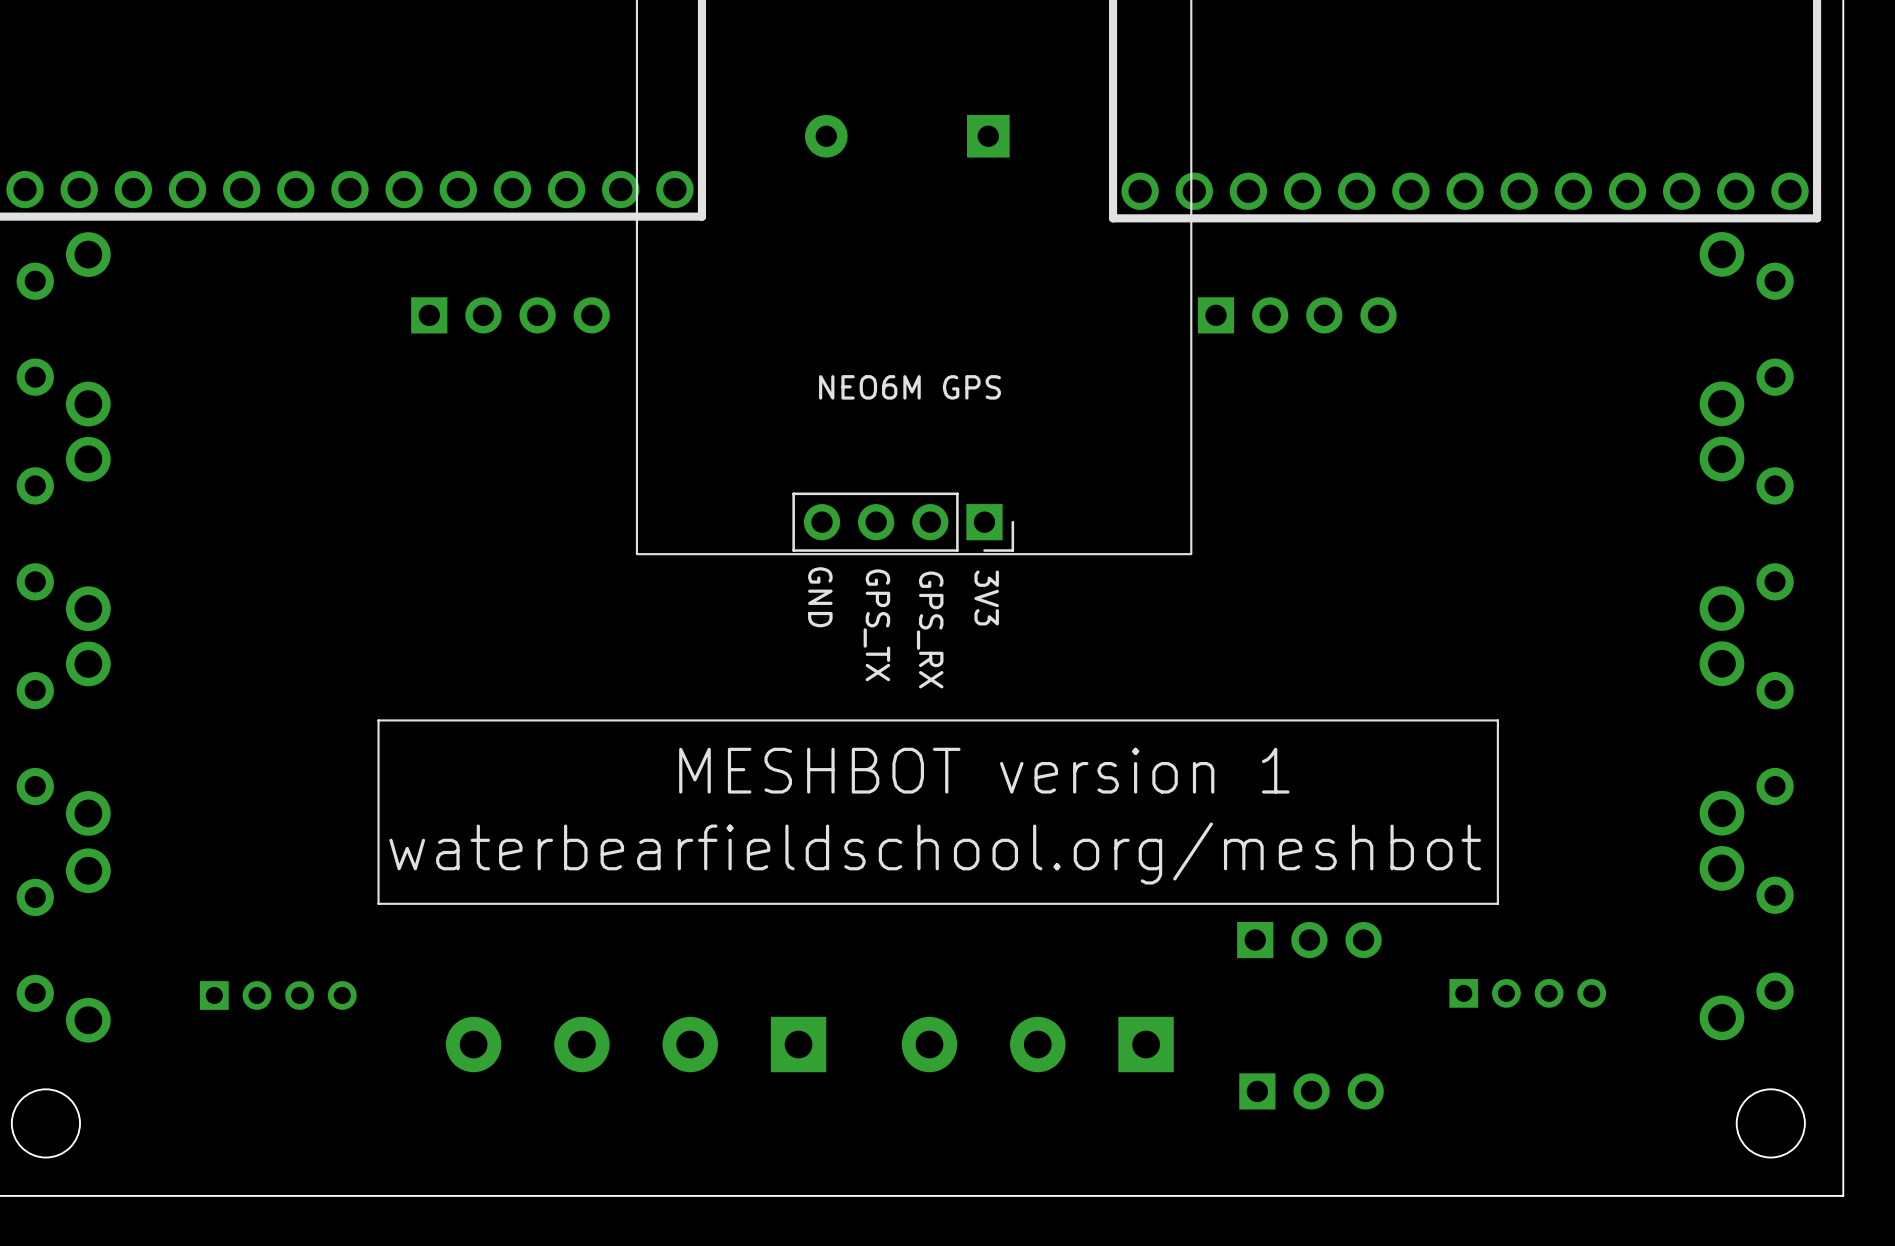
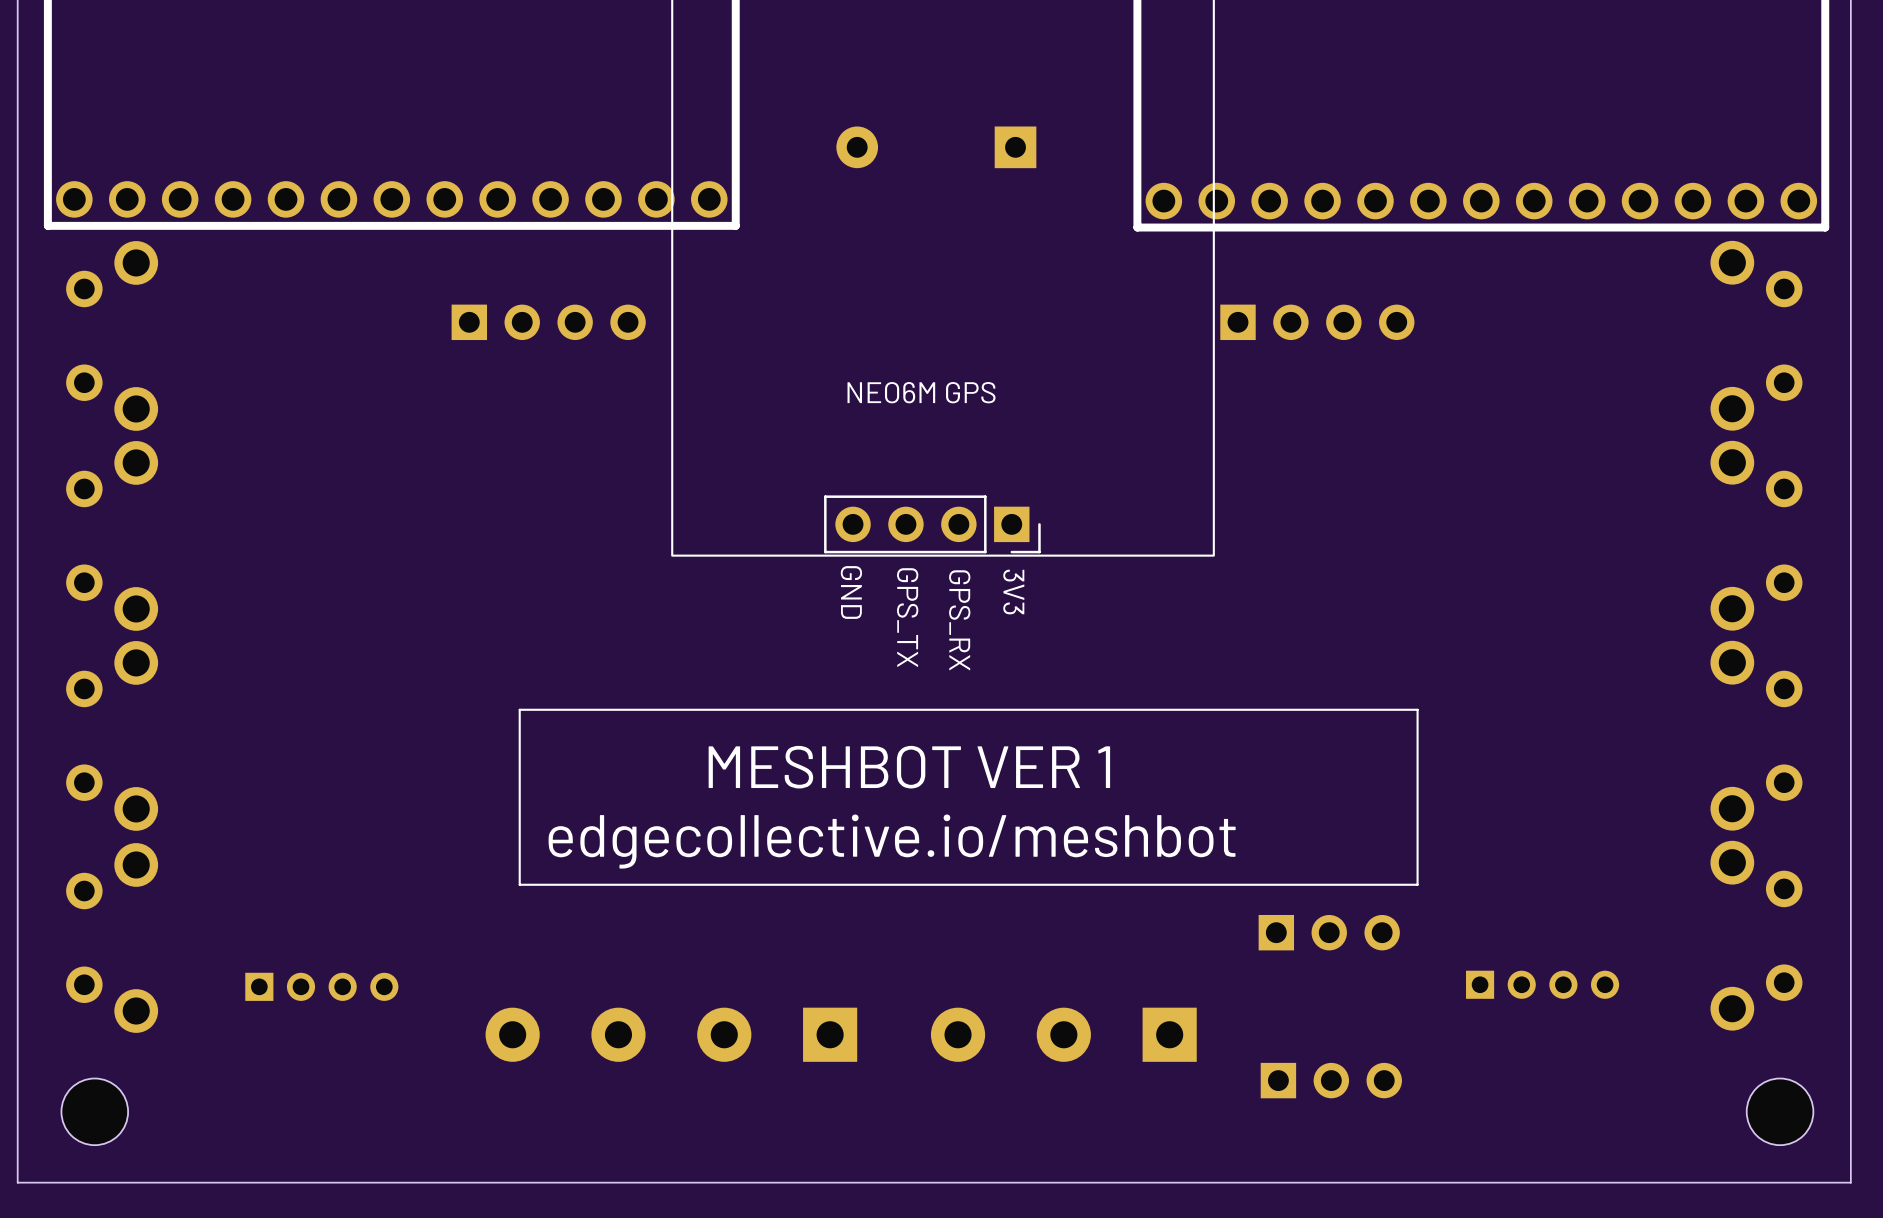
line: (1497, 720) (378, 720) (378, 903) (1497, 903) (1497, 720) -> (1417, 709) (1417, 884) (519, 884) (519, 709) (1417, 709)
text: MESHBOT version 1 (984, 770) -> MESHBOT VER 1 (909, 767)
text: none -> edgecollective.io/meshbot (892, 841)
text: waterbearfieldschool.org/meshbot (935, 853) -> none

